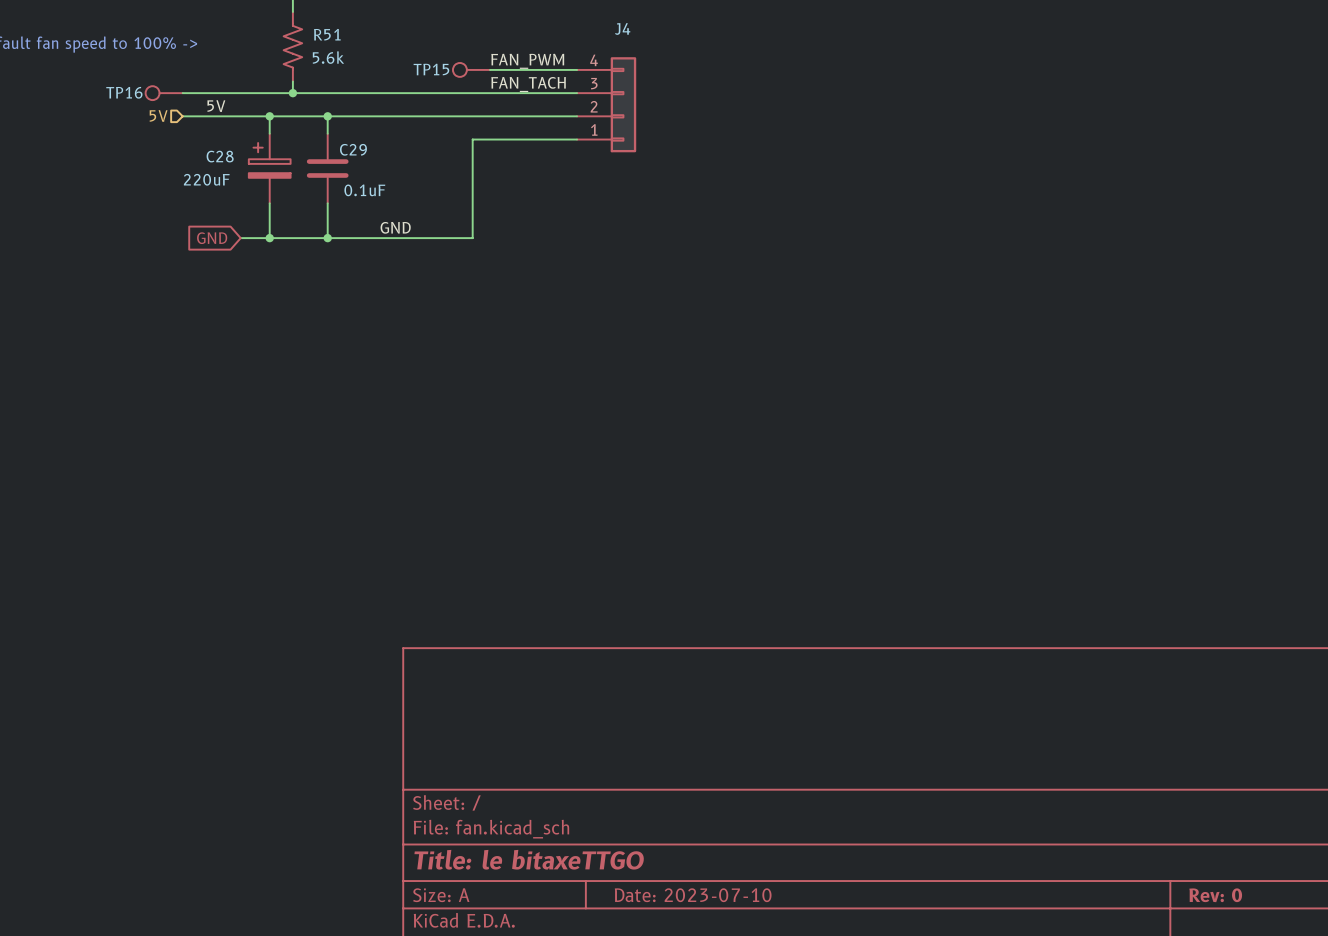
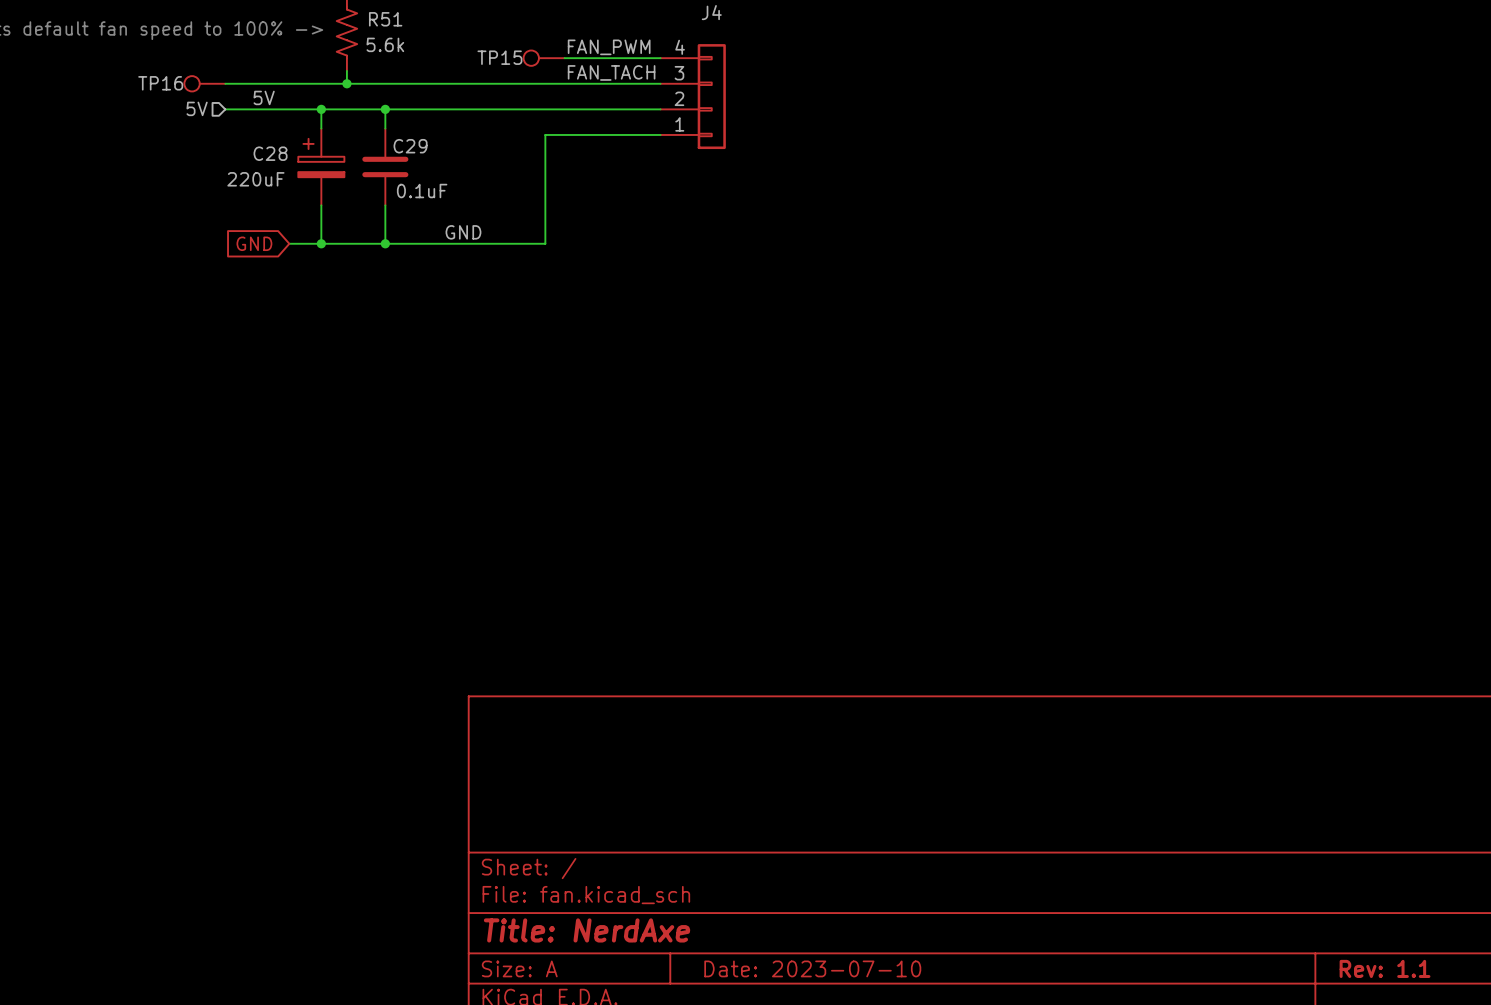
title block: Title: le bitaxeTTGO (529, 859) -> Title: NerdAxe (587, 930)
title block: Rev: 0 (1215, 895) -> Rev: 1.1 (1385, 968)

